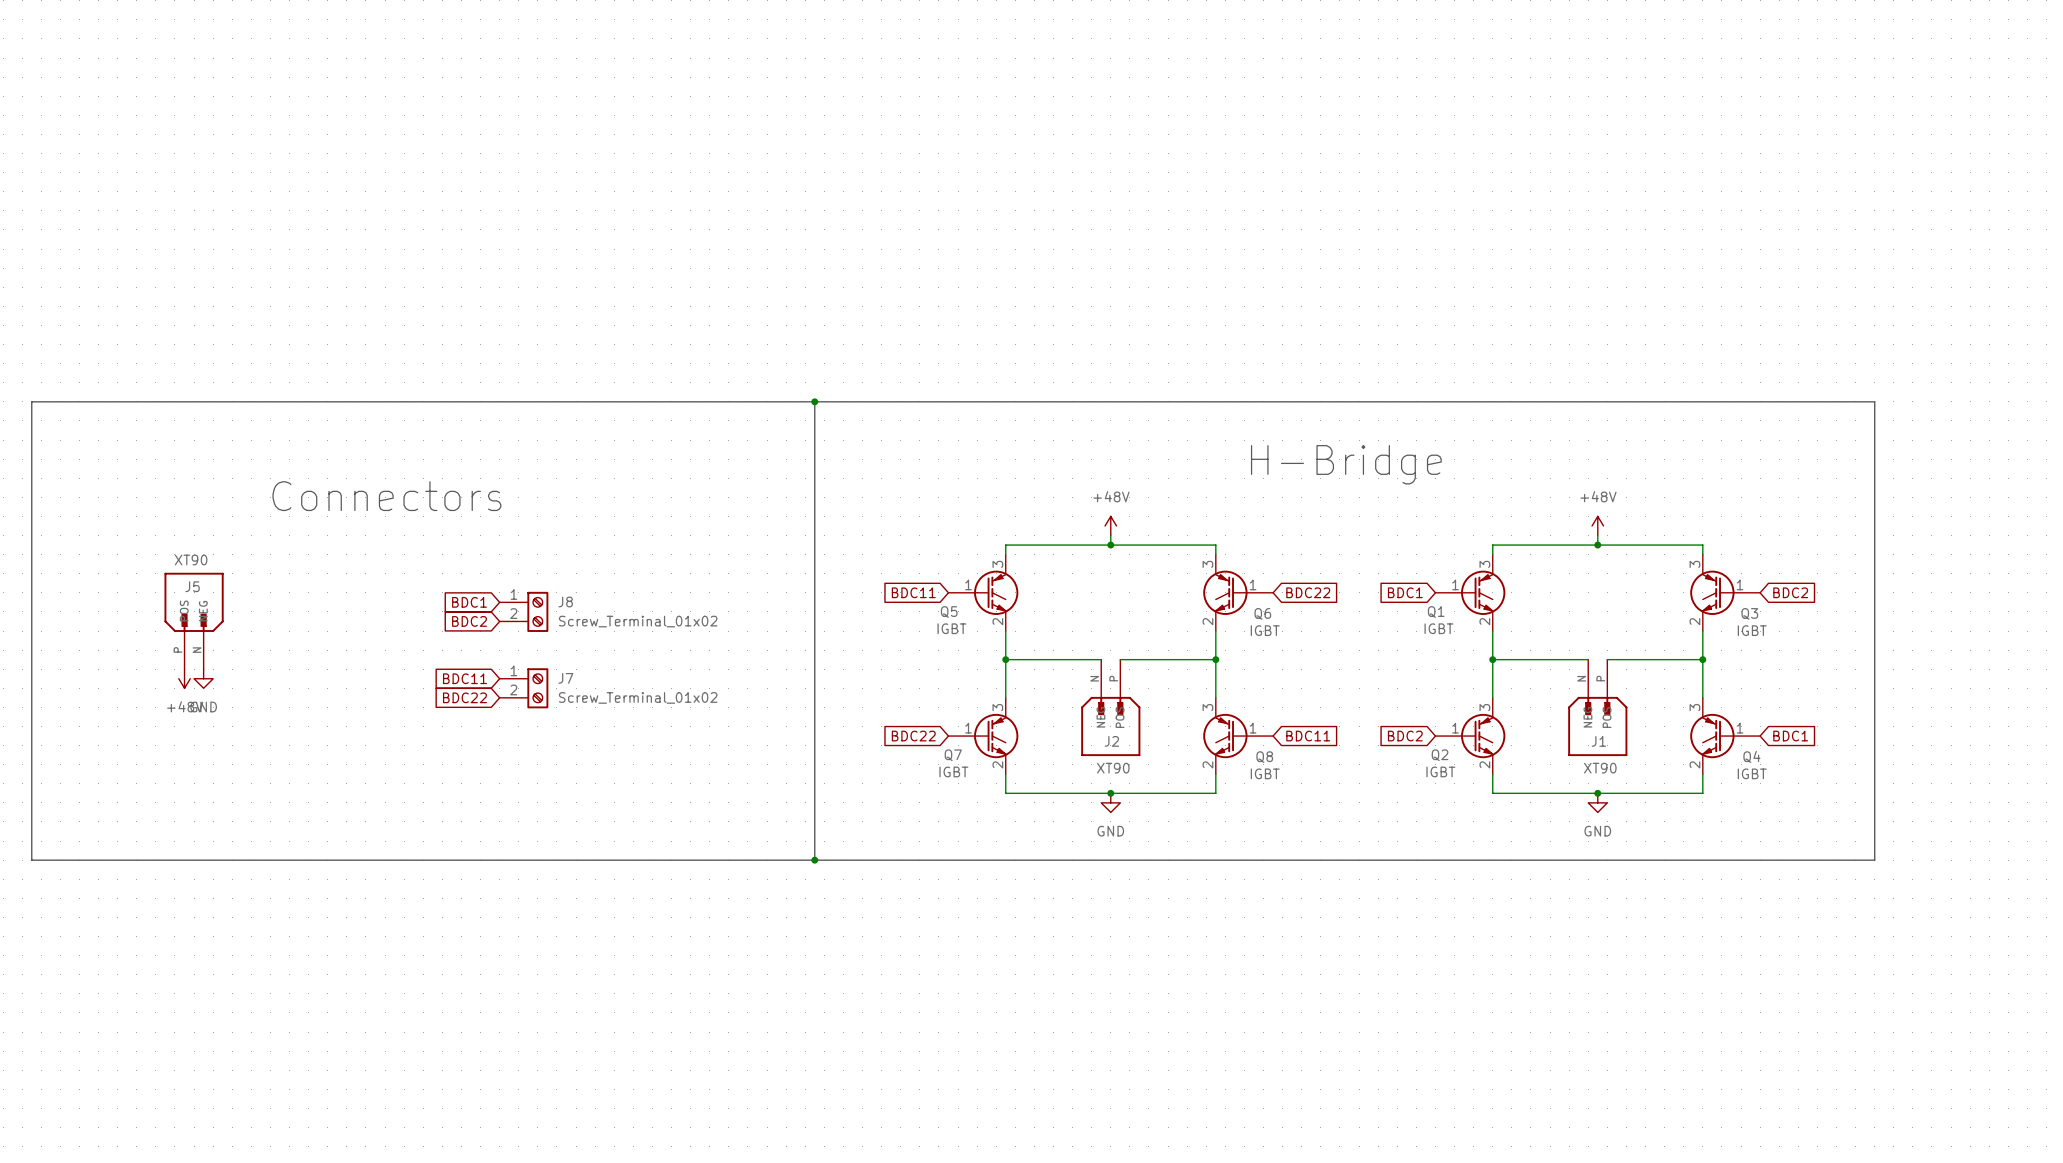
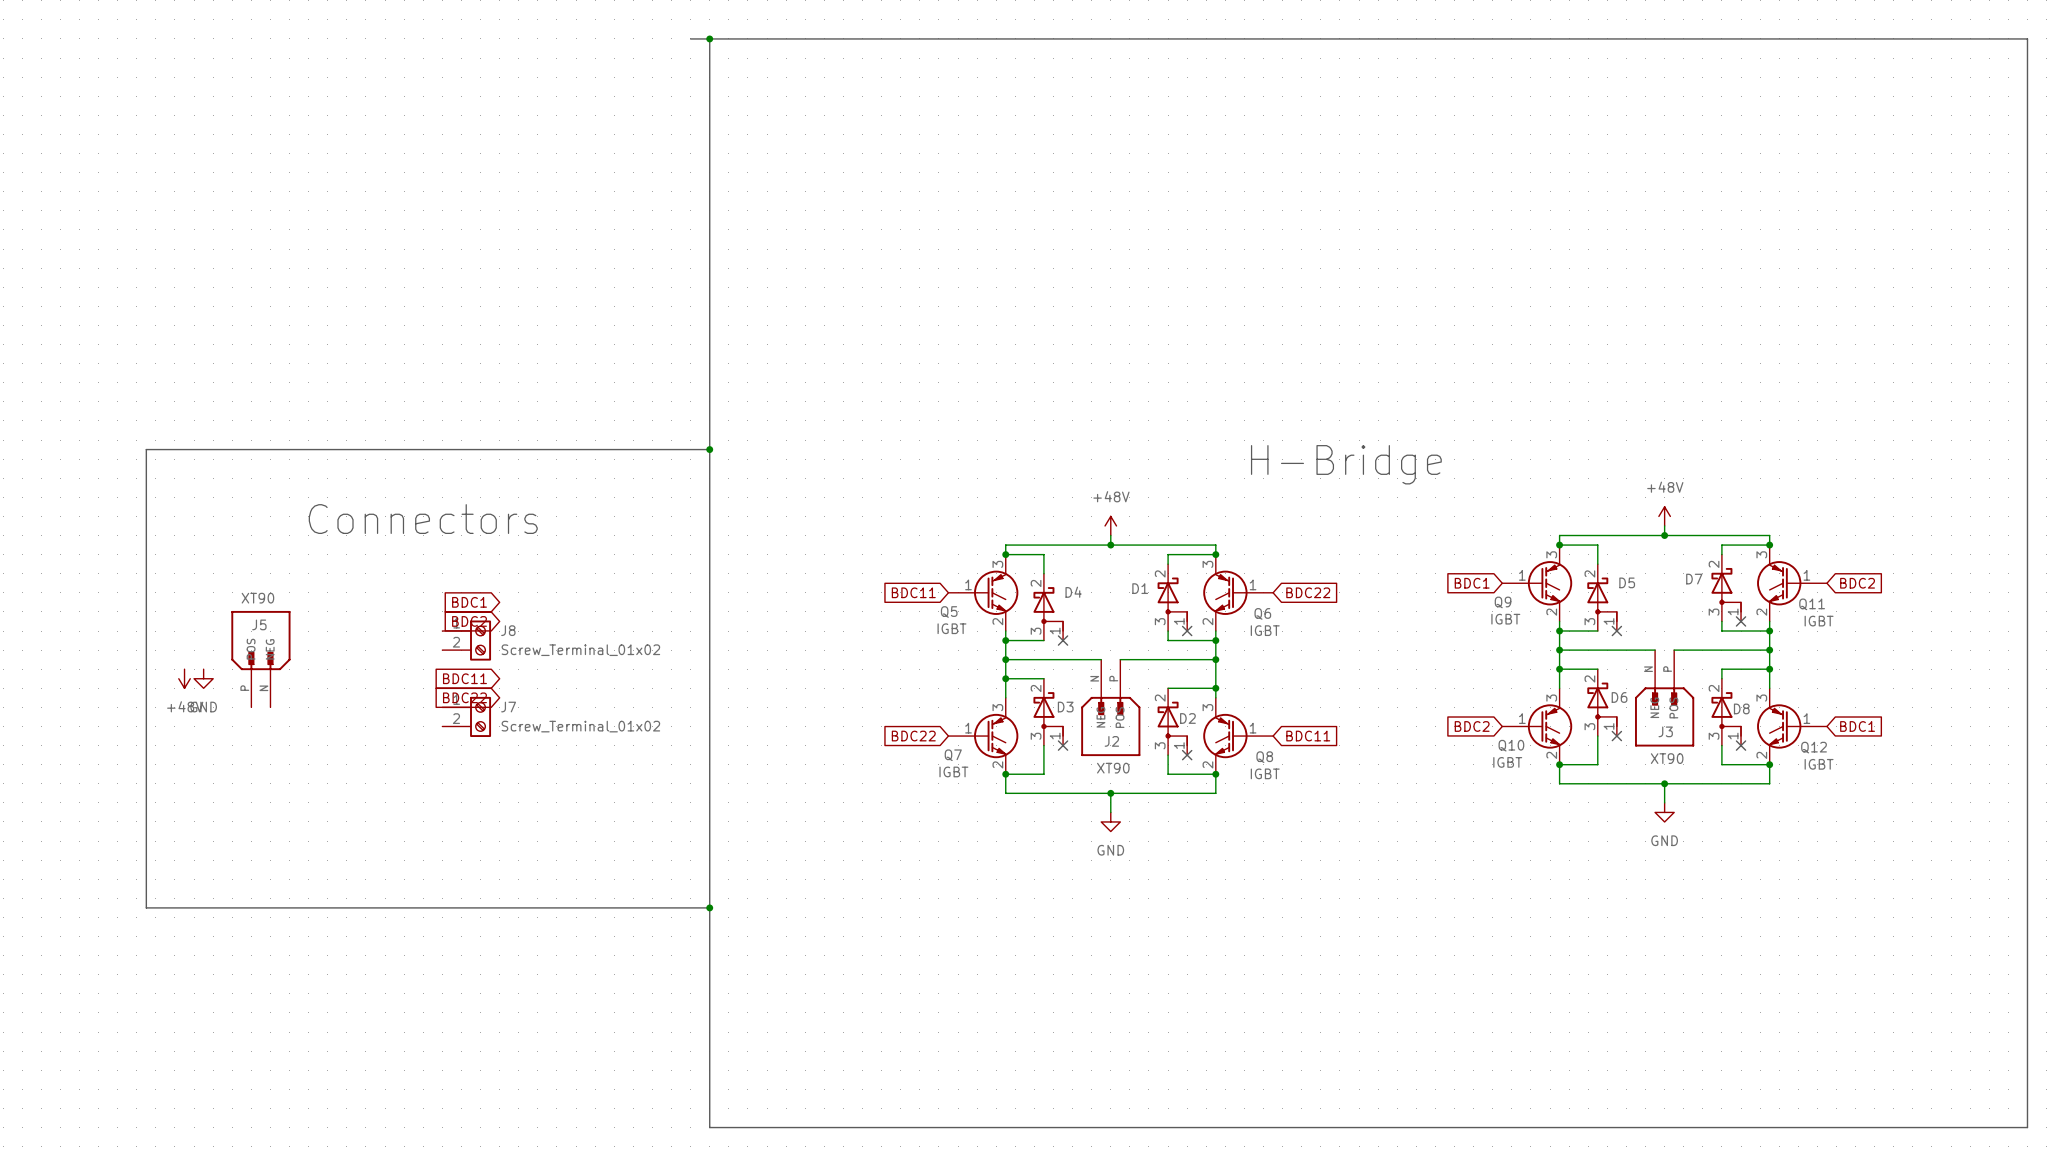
bus: none -> (690, 38) (2027, 38) (2027, 1127) (709, 1127) (709, 38)
junction: none -> (709, 38)
bus: (31, 401) (1874, 401) (1874, 860) (31, 860) (31, 401) -> none
bus: (814, 401) (814, 860) -> none
junction: (814, 401) -> none
bus: none -> (709, 449) (146, 449) (146, 907) (709, 907)
junction: none -> (709, 449)
text position: Connectors (386, 496) -> Connectors (423, 519)
power symbol position: +48V (1597, 525) -> +48V (1664, 516)
wire: none -> (1664, 525) (1664, 535)
wire: (1597, 535) (1597, 545) (1702, 545) (1702, 554) -> none
junction: none -> (1664, 535)
wire: (1559, 545) (1492, 545) (1492, 554) -> (1559, 545) (1559, 535) (1769, 535) (1769, 545) (1721, 545) (1721, 554)
junction: none -> (1559, 545)
wire: none -> (1597, 545) (1597, 564)
junction: (1597, 545) -> none
junction: none -> (1769, 545)
wire: none -> (1005, 554) (1043, 554) (1043, 573)
junction: none -> (1005, 554)
wire: none -> (1215, 554) (1168, 554) (1168, 564)
junction: none -> (1215, 554)
Q9: none -> IGBT (1537, 583)
Q11: none -> IGBT (1792, 583)
D7: none -> (1726, 588)
global label position: BDC1 (1405, 592) -> BDC1 (1472, 583)
Q1: IGBT (1470, 592) -> none
Q3: IGBT (1725, 592) -> none
global label position: BDC2 (1790, 592) -> BDC2 (1857, 583)
D1: none -> (1172, 597)
D5: none -> (1602, 597)
D4: none -> (1048, 607)
J8 position: (523, 611) -> (466, 640)
J5 position: (194, 620) -> (260, 659)
wire: none -> (1721, 621) (1721, 631) (1769, 631)
no-connect mark: none -> (1741, 621)
wire: none -> (1168, 631) (1168, 640) (1215, 640)
no-connect mark: none -> (1187, 631)
wire: (1492, 631) (1492, 697) -> (1559, 621) (1559, 688)
wire: none -> (1559, 631) (1597, 631)
junction: none -> (1559, 631)
no-connect mark: none -> (1616, 631)
wire: (1702, 631) (1702, 697) -> (1769, 621) (1769, 688)
junction: none -> (1769, 631)
wire: none -> (1005, 640) (1043, 640)
junction: none -> (1005, 640)
no-connect mark: none -> (1063, 640)
junction: none -> (1215, 640)
junction: none -> (1559, 650)
junction: none -> (1769, 650)
wire: (1492, 659) (1588, 659) -> (1559, 650) (1655, 650)
junction: (1492, 659) -> none
wire: (1607, 659) (1702, 659) -> (1674, 650) (1769, 650)
junction: (1702, 659) -> none
wire: none -> (1559, 669) (1597, 669)
junction: none -> (1559, 669)
wire: none -> (1769, 669) (1721, 669) (1721, 678)
junction: none -> (1769, 669)
wire: none -> (1005, 678) (1043, 678)
junction: none -> (1005, 678)
J7 position: (523, 688) -> (466, 716)
wire: none -> (1168, 688) (1215, 688)
junction: none -> (1215, 688)
J3: none -> XT90 (1664, 698)
D6: none -> (1602, 702)
J1: XT90 (1597, 707) -> none
D3: none -> (1048, 712)
D8: none -> (1726, 712)
D2: none -> (1172, 721)
Q10: none -> IGBT (1537, 726)
Q12: none -> IGBT (1792, 726)
global label position: BDC2 (1405, 736) -> BDC2 (1472, 726)
Q2: IGBT (1470, 736) -> none
wire: none -> (1597, 736) (1597, 764) (1559, 764) (1559, 783) (1769, 783) (1769, 764) (1721, 764) (1721, 745)
no-connect mark: none -> (1616, 736)
Q4: IGBT (1725, 736) -> none
global label position: BDC1 (1790, 736) -> BDC1 (1857, 726)
wire: none -> (1043, 745) (1043, 774) (1005, 774)
no-connect mark: none -> (1063, 745)
no-connect mark: none -> (1741, 745)
wire: none -> (1168, 755) (1168, 774) (1215, 774)
no-connect mark: none -> (1187, 755)
junction: none -> (1559, 764)
junction: none -> (1769, 764)
junction: none -> (1005, 774)
junction: none -> (1215, 774)
wire: (1492, 774) (1492, 793) (1702, 793) (1702, 774) -> none
wire: none -> (1664, 783) (1664, 802)
junction: none -> (1664, 783)
junction: (1597, 793) -> none
power symbol position: GND (1110, 802) -> GND (1110, 821)
power symbol position: GND (1597, 802) -> GND (1664, 812)
junction: (814, 860) -> none
junction: none -> (709, 907)

